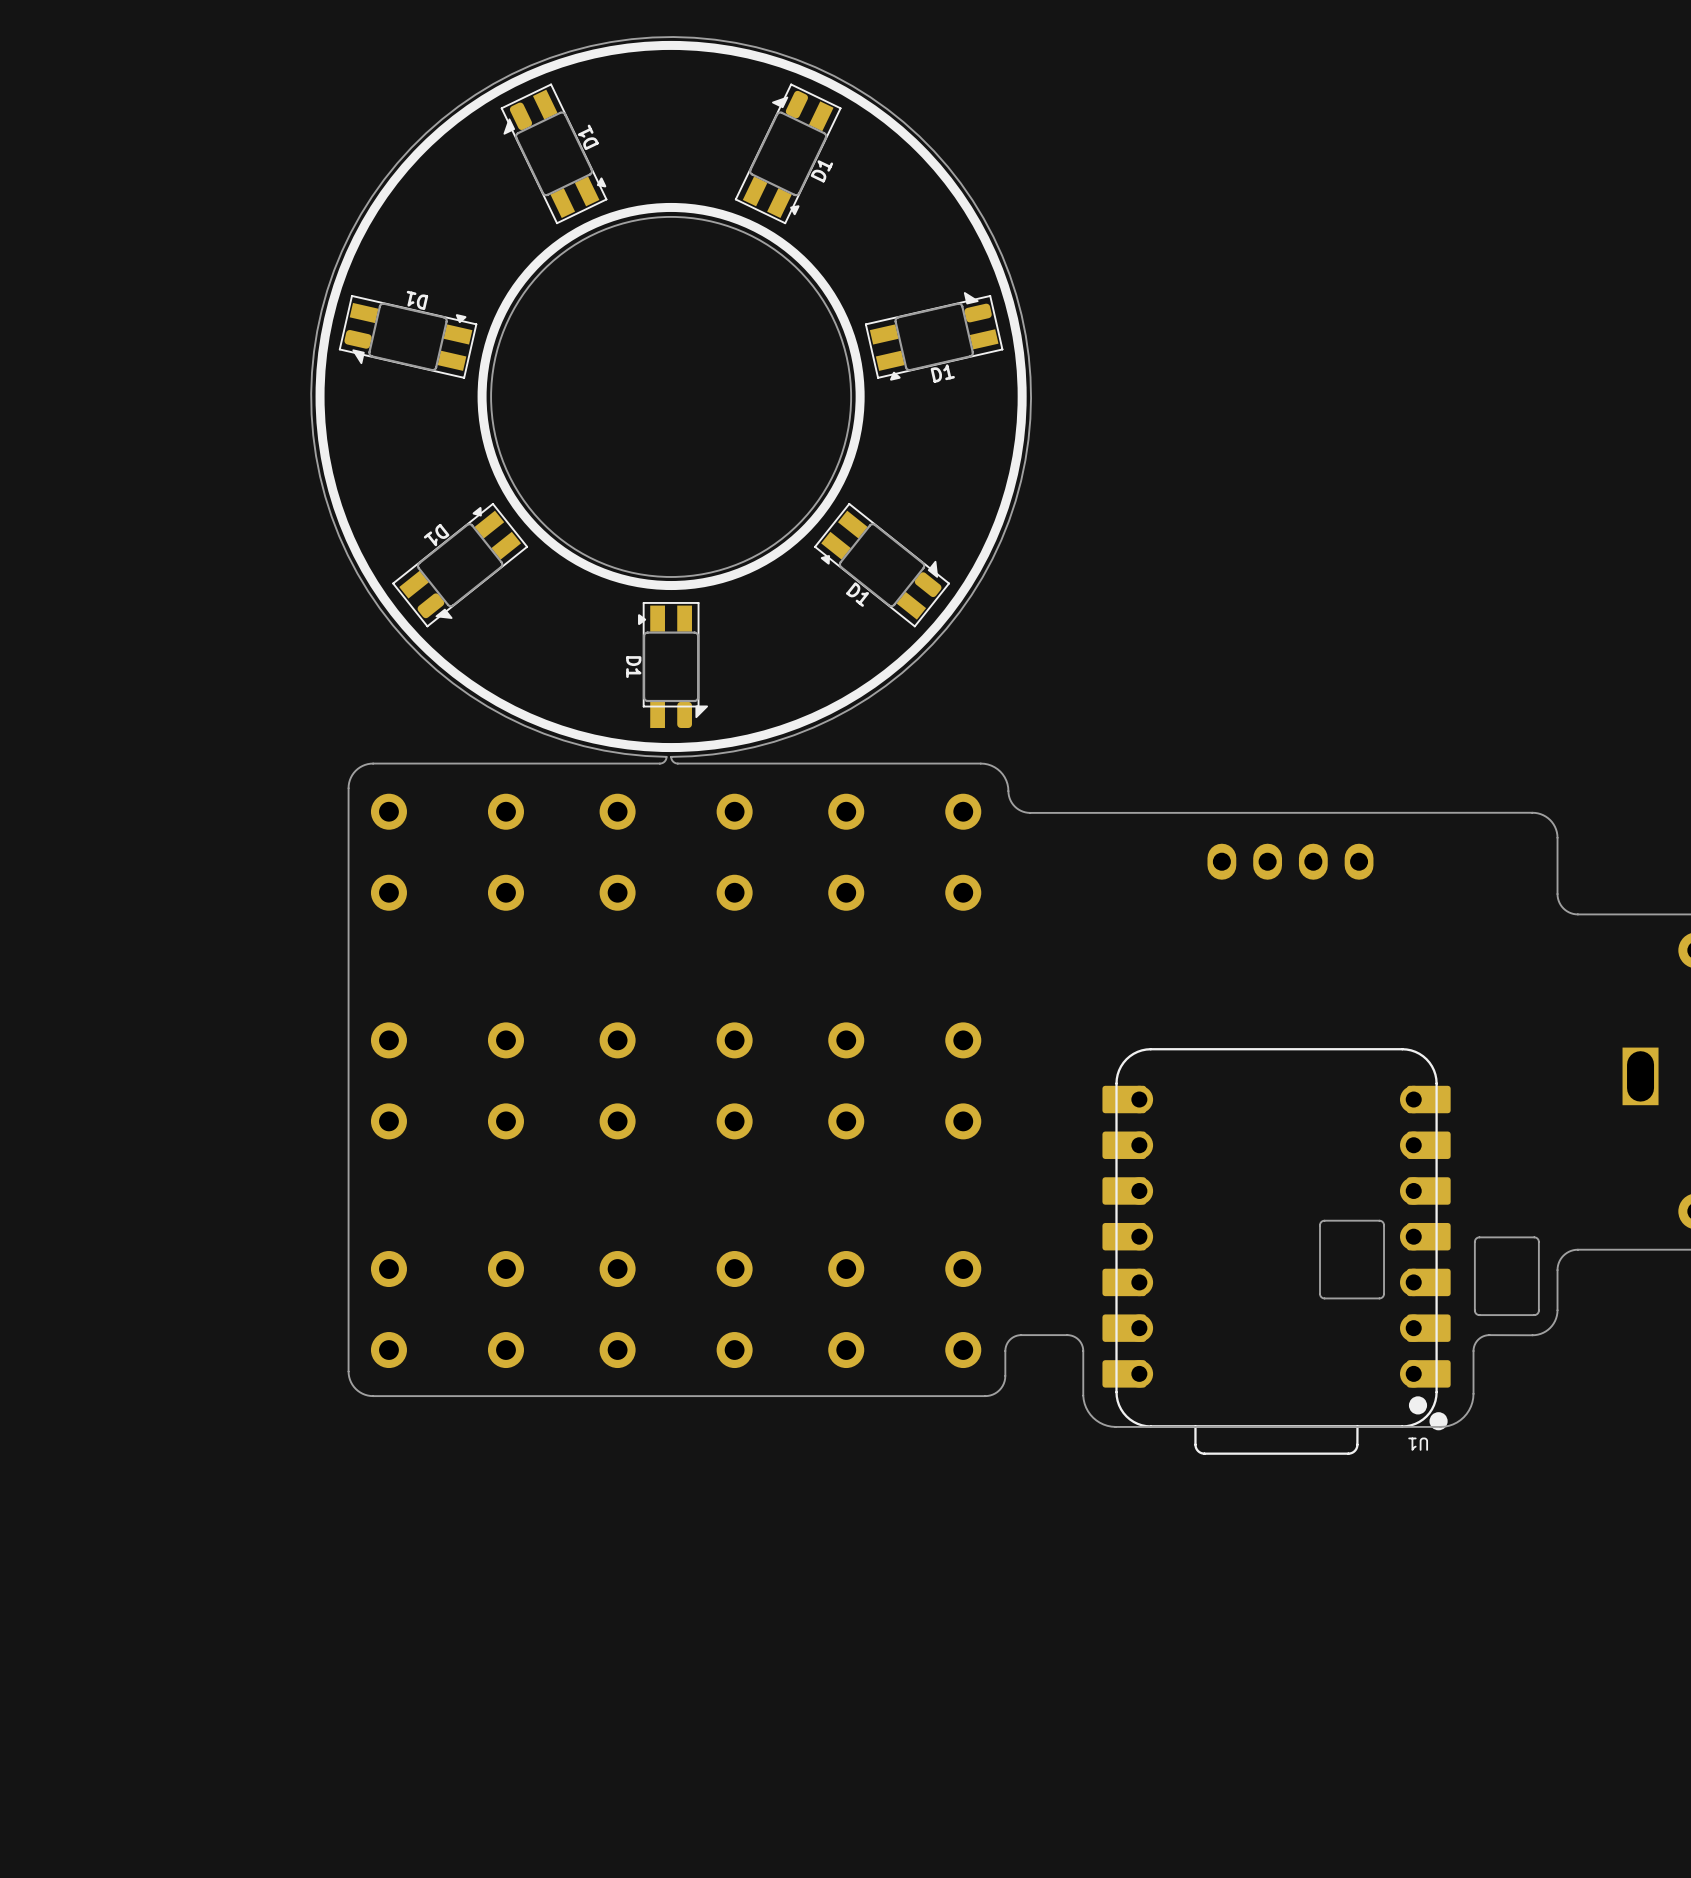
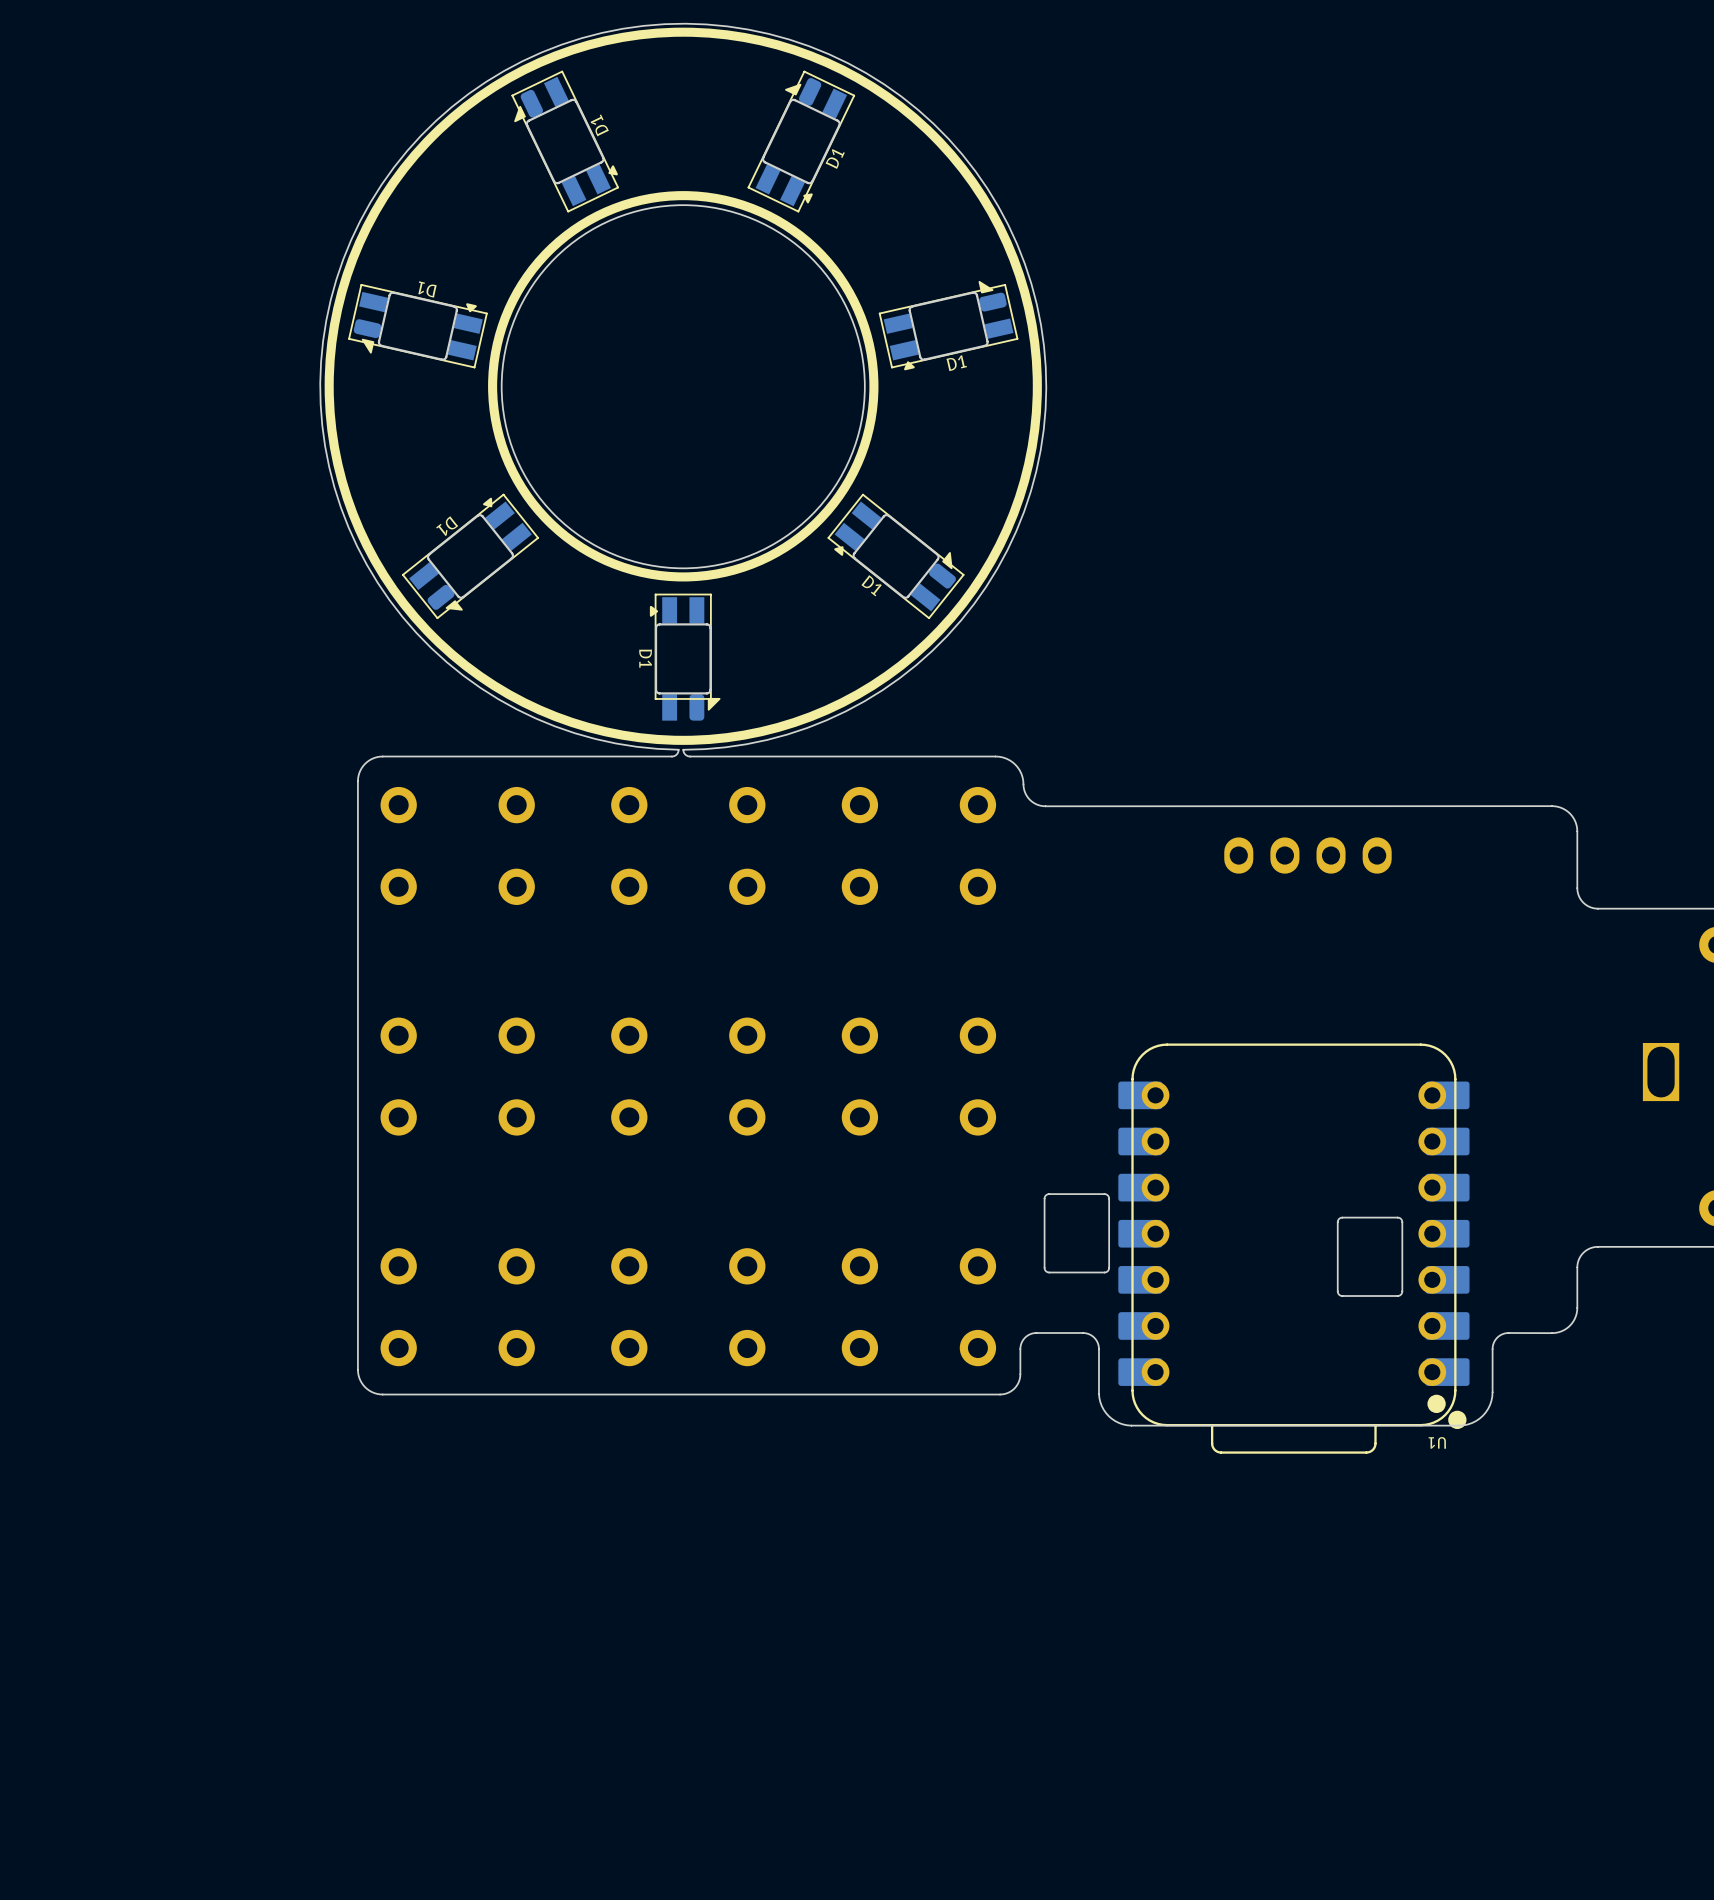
board edge: none -> (1104, 1194) (1049, 1194) (1045, 1195) (1044, 1267) (1046, 1271) (1104, 1272) (1108, 1270) (1109, 1198) (1104, 1194)
board edge: (1534, 1237) (1479, 1237) (1475, 1239) (1474, 1310) (1476, 1314) (1534, 1315) (1537, 1313) (1538, 1241) (1534, 1237) -> none

